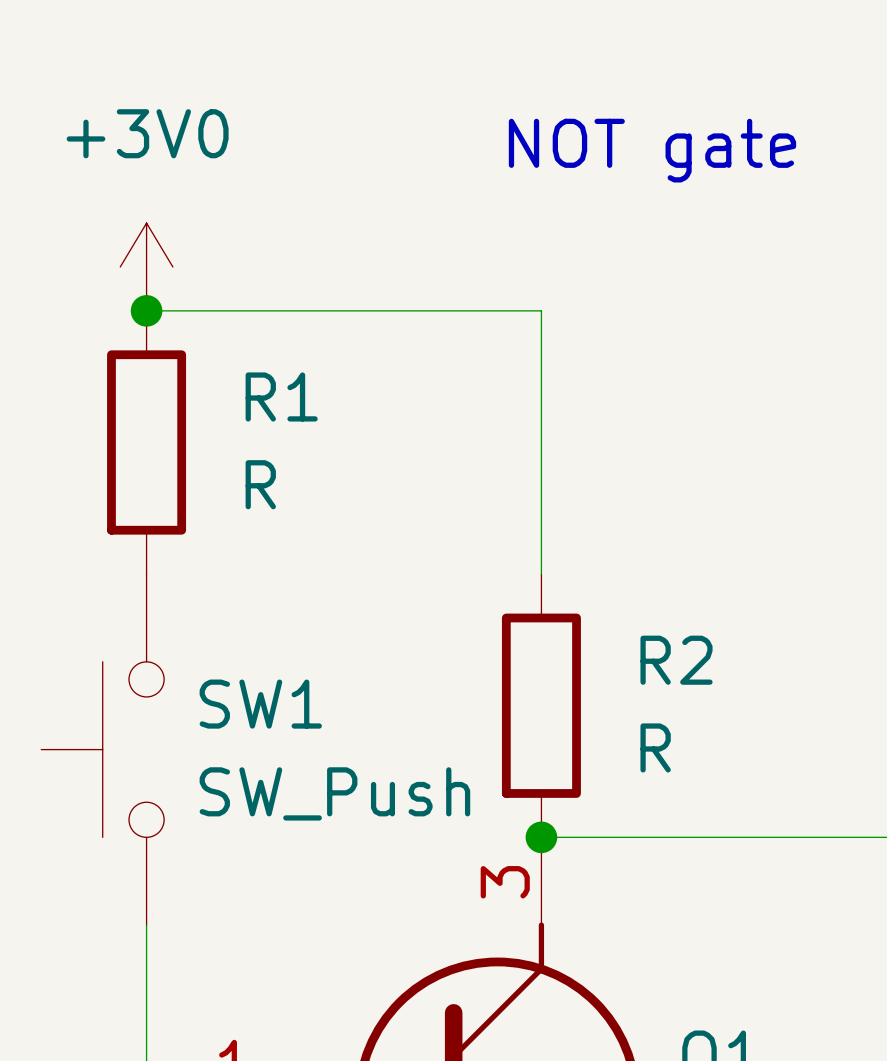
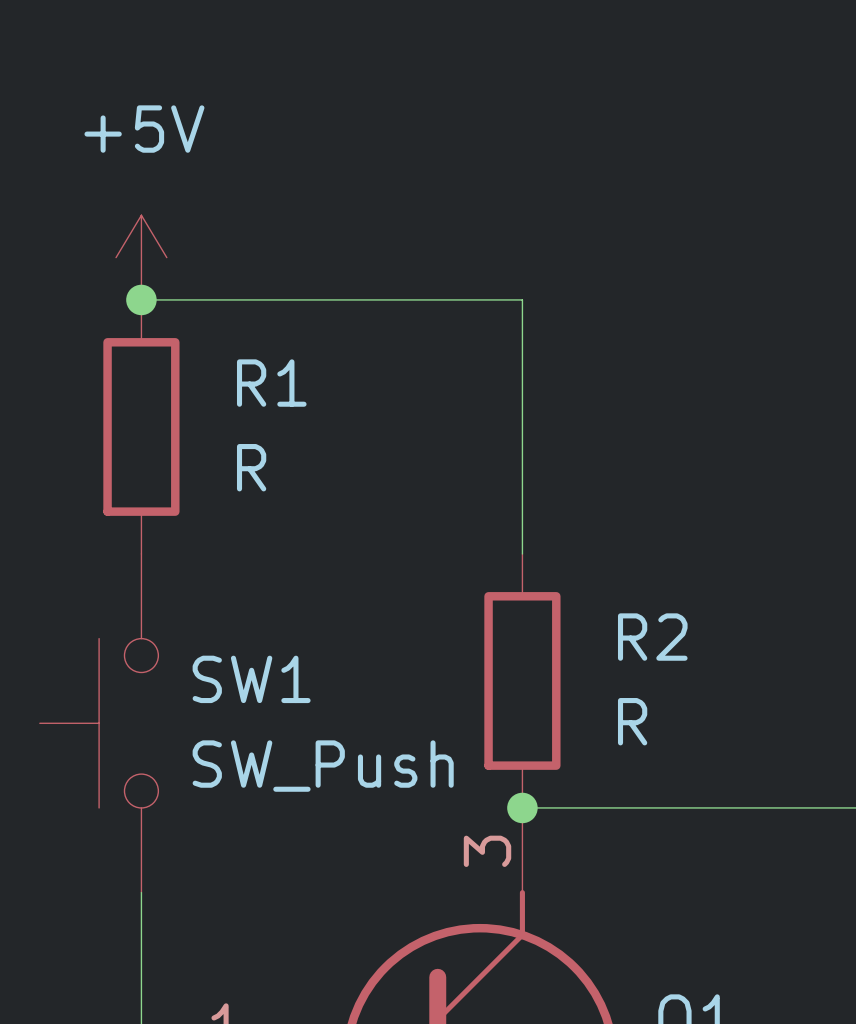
text: NOT gate (652, 150) -> none
power symbol: +3V0 (146, 267) -> +5V (141, 257)

